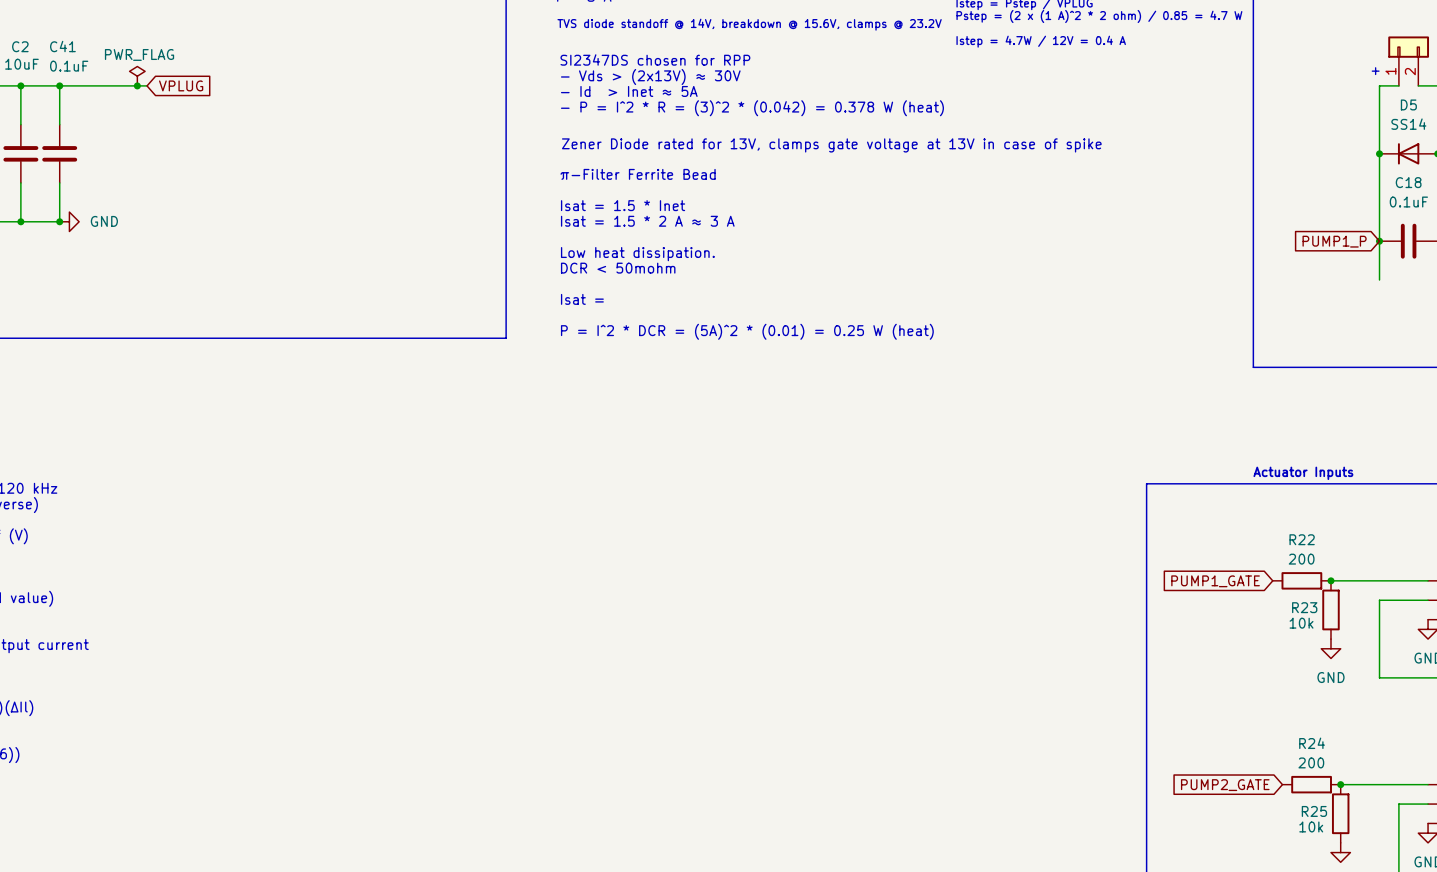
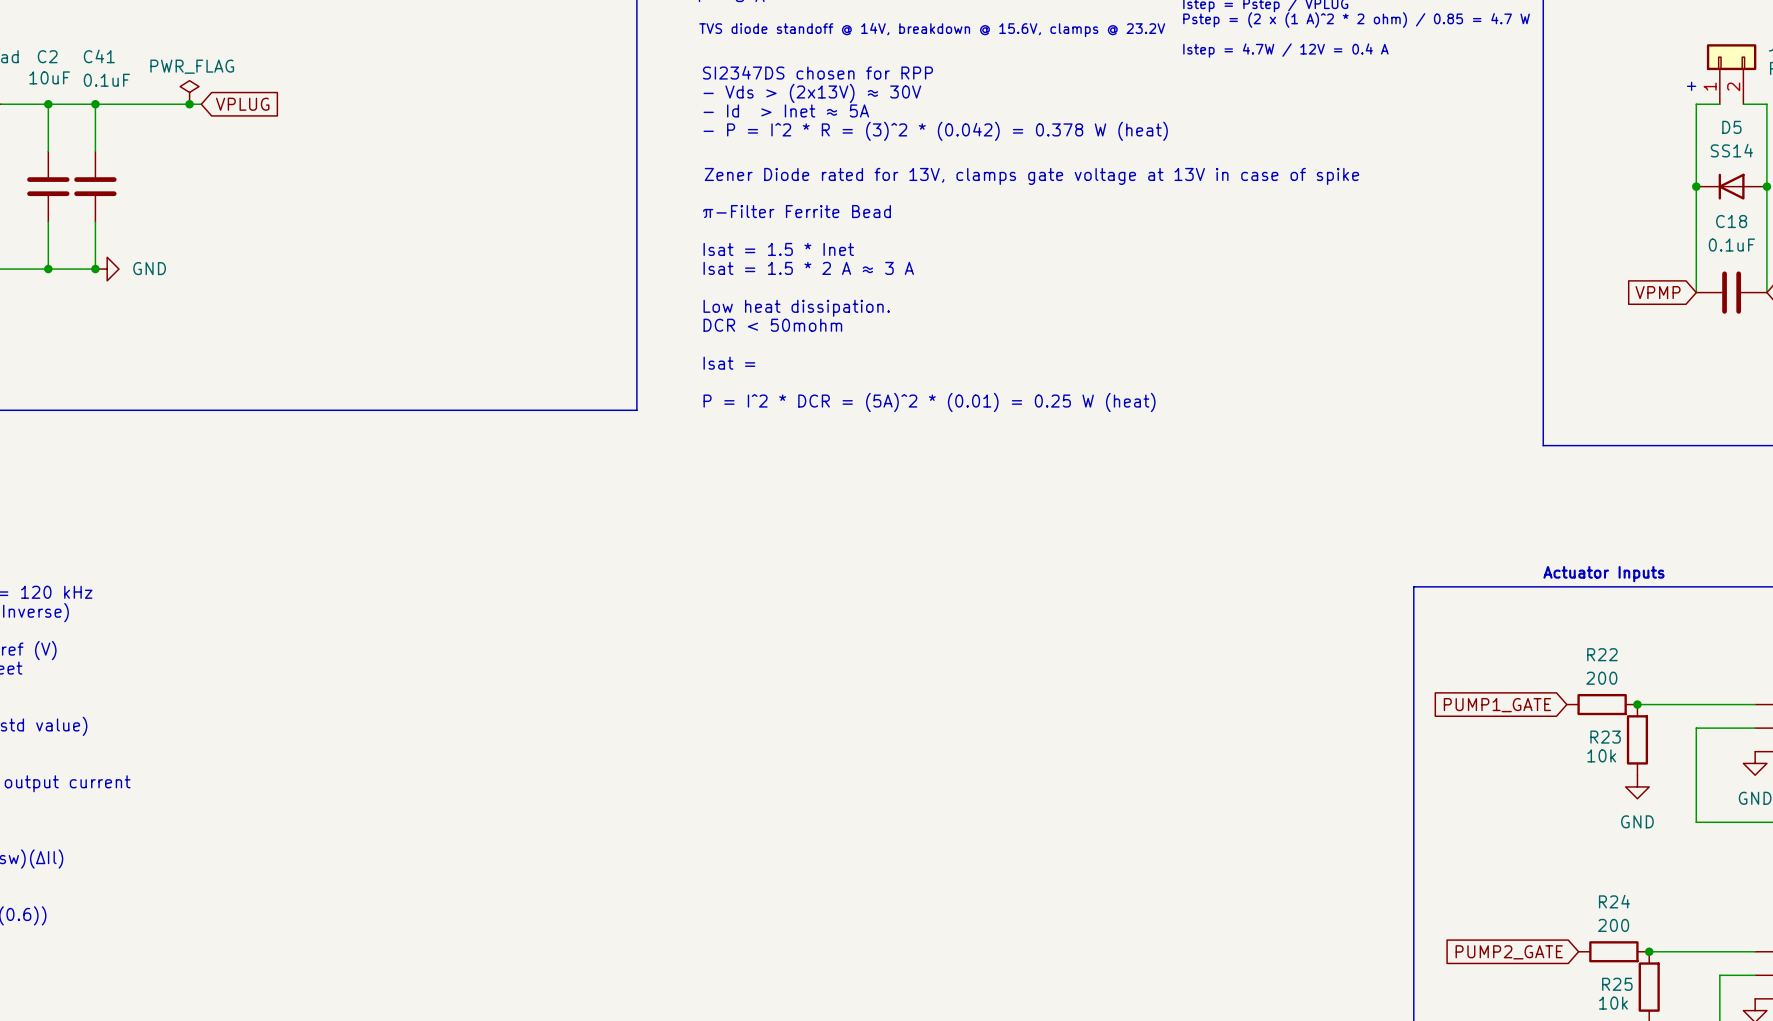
global label: PUMP1_P (1334, 241) -> VPMP (1658, 292)
wire: (1379, 241) (1379, 280) -> none
junction: (1379, 241) -> none

